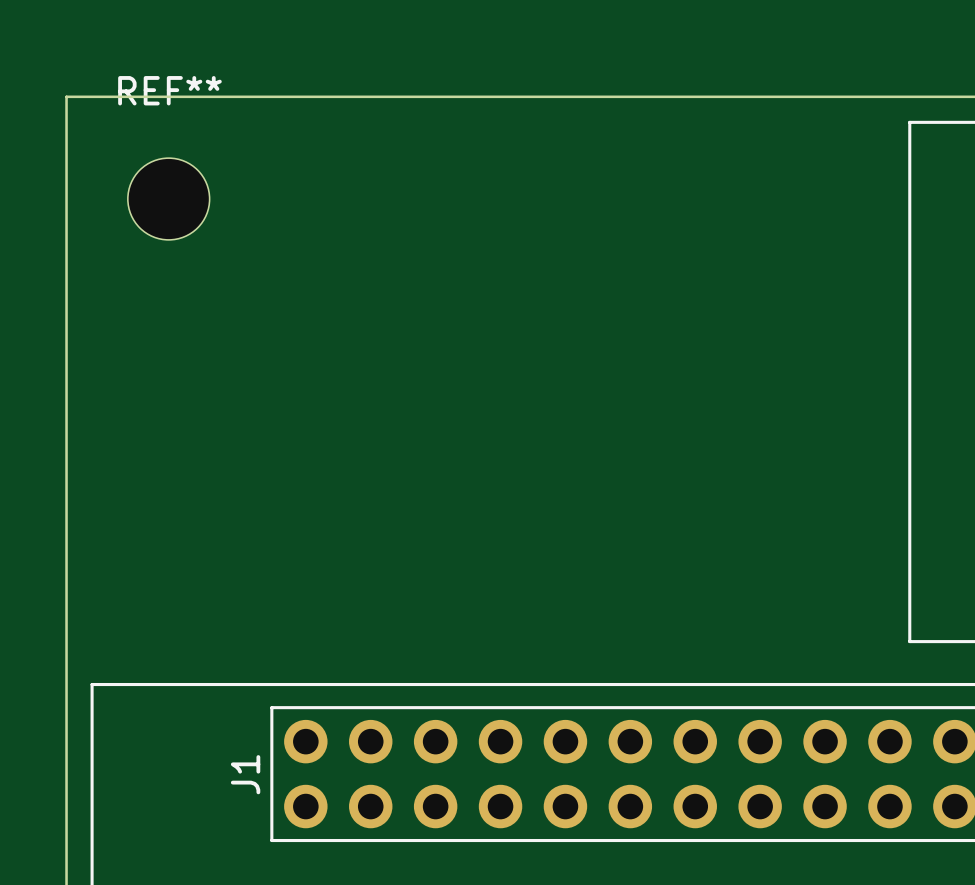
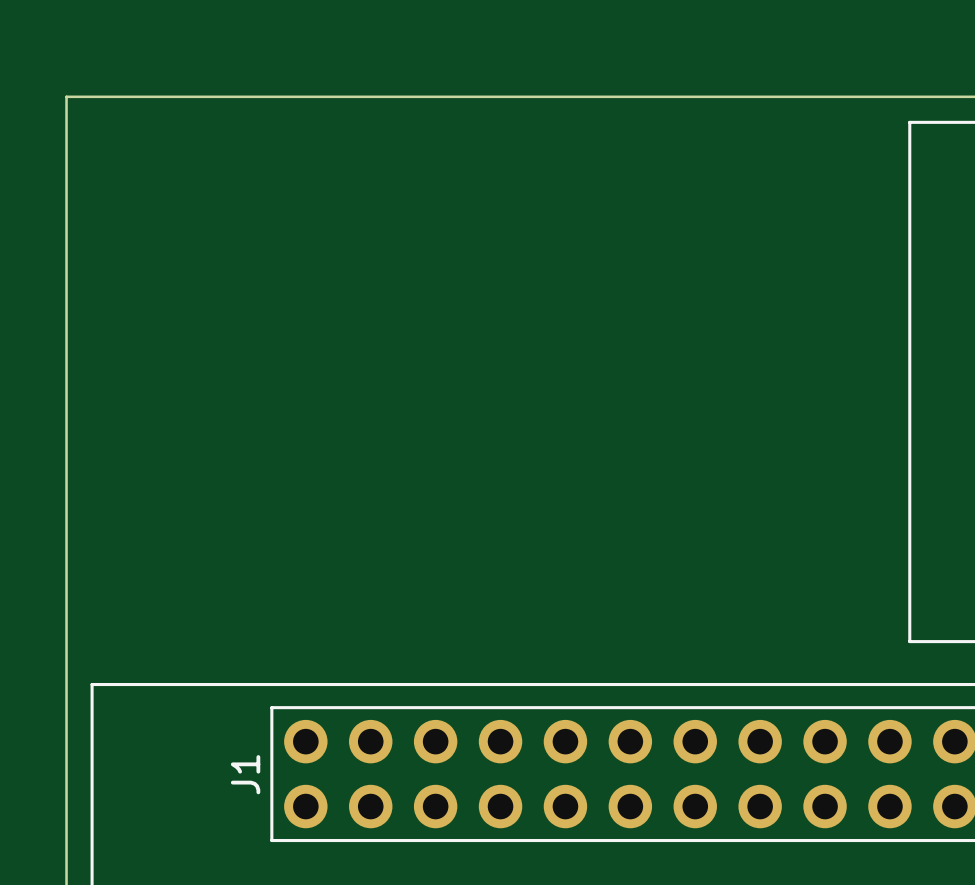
REF**: (168, 199) -> none

